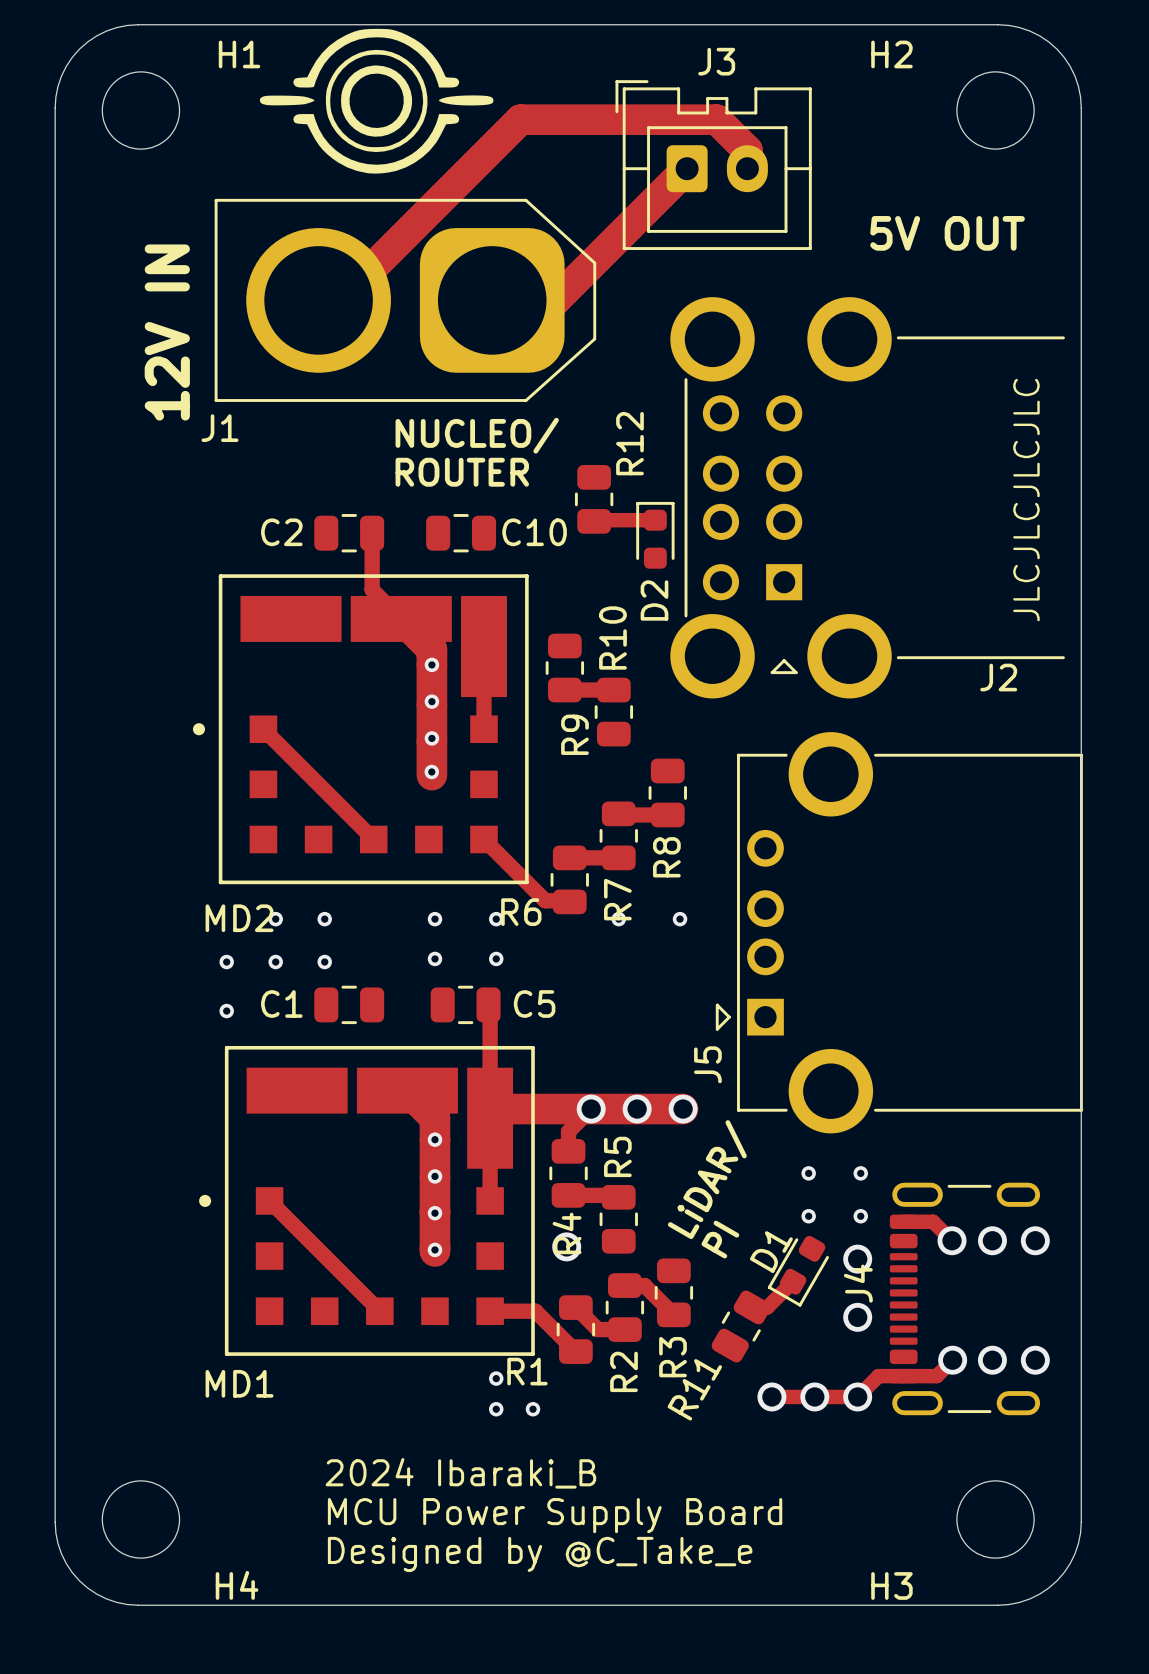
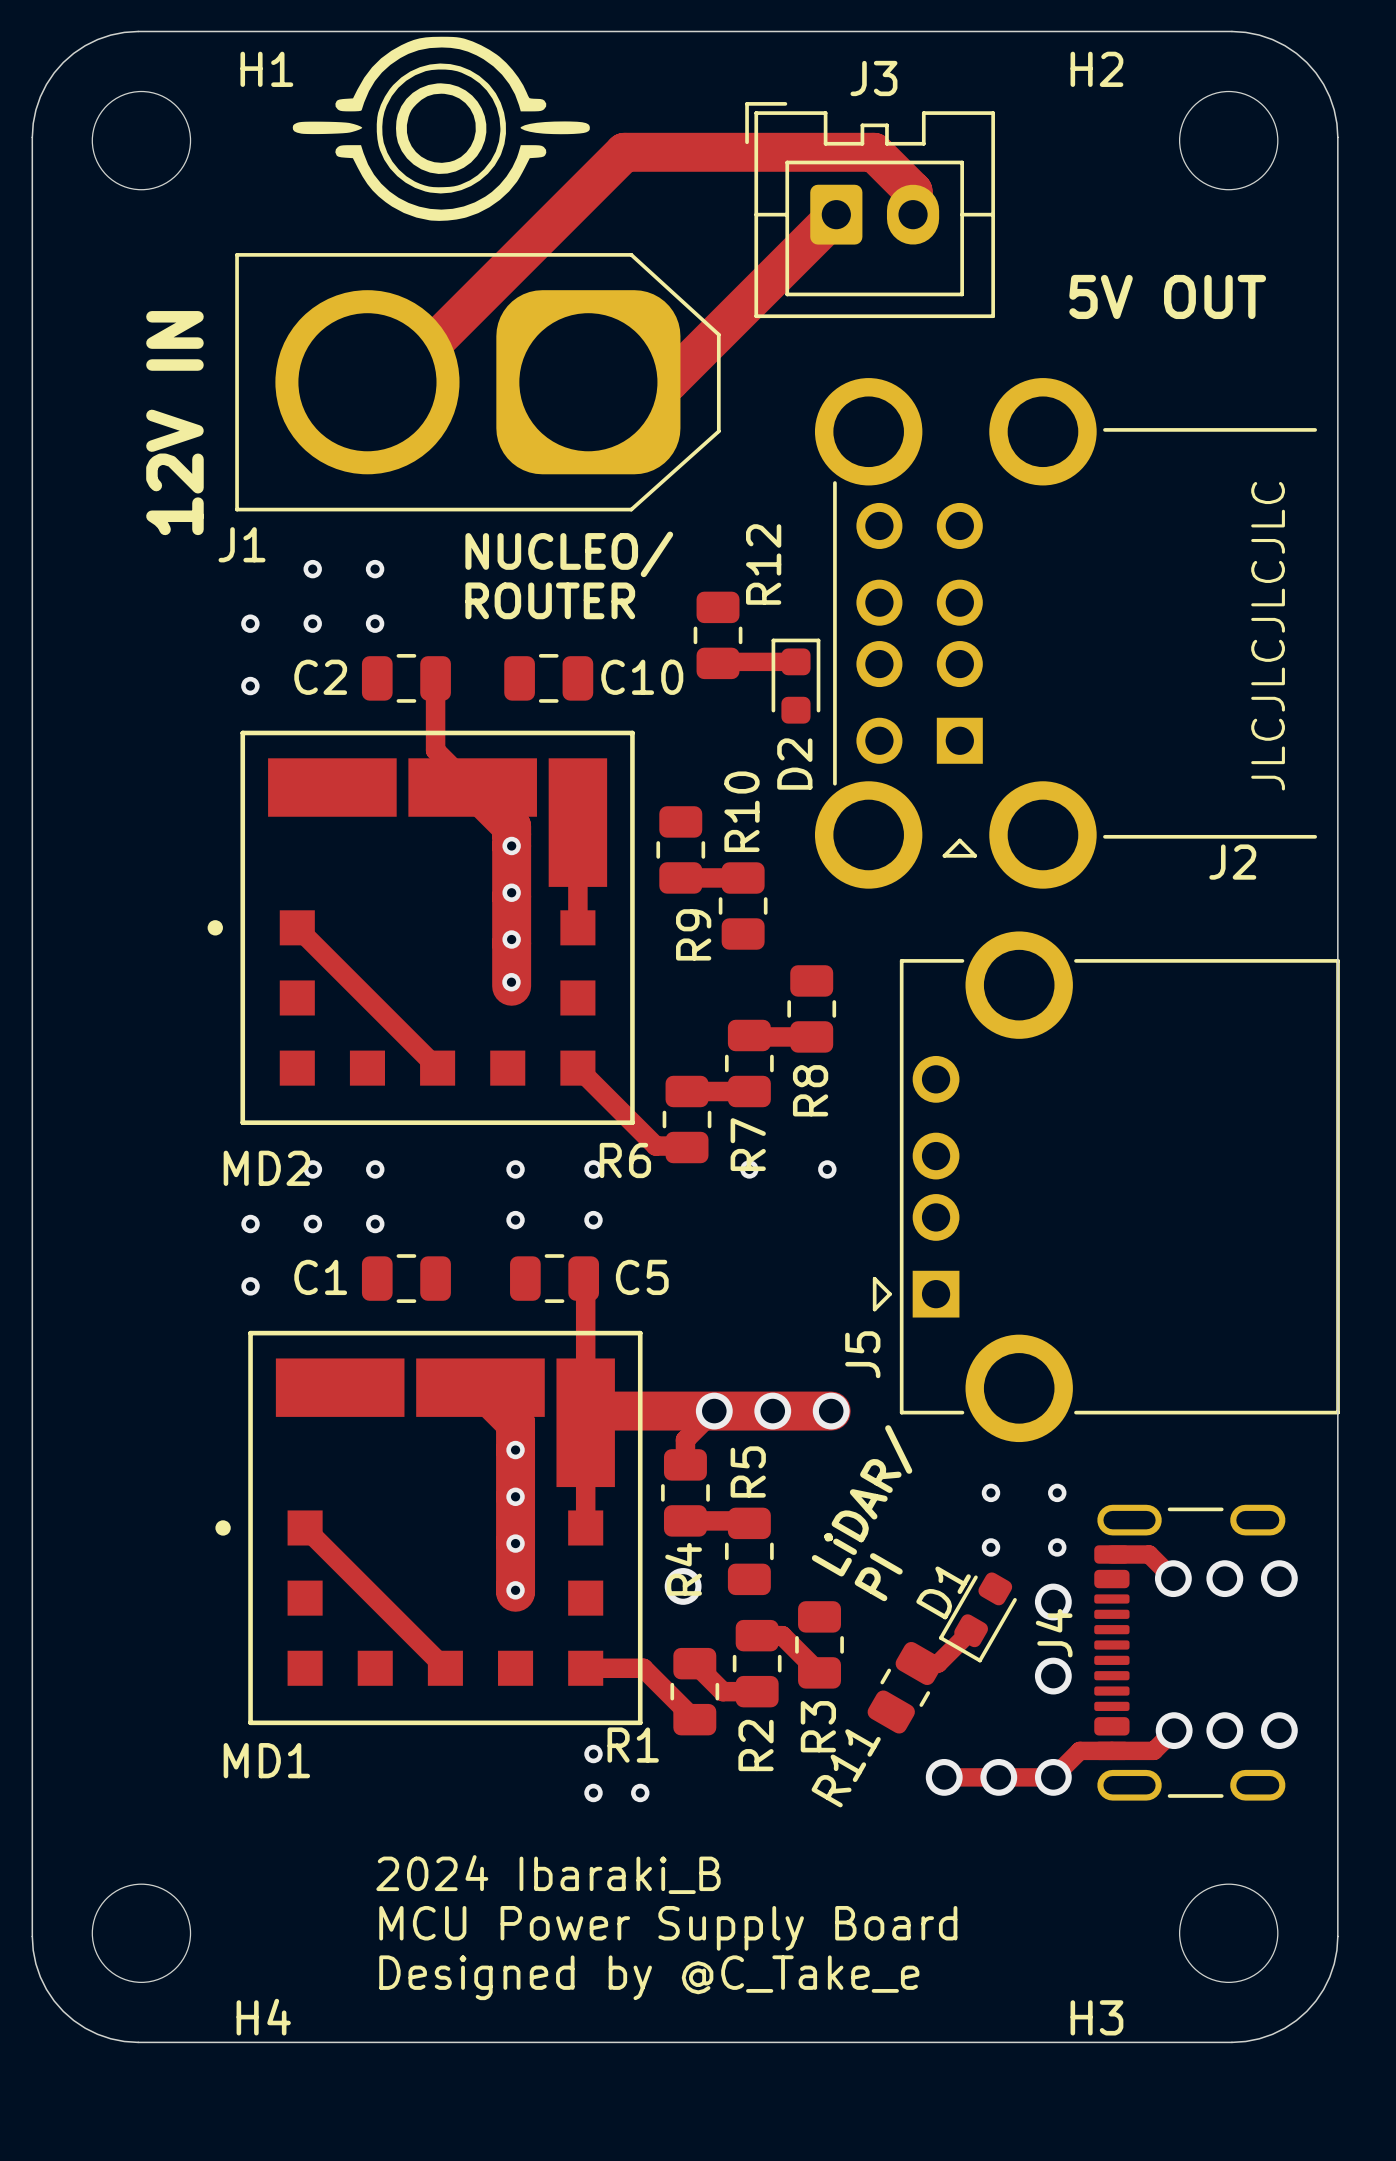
via: none -> (312, 569)
via: none -> (375, 569)
via: none -> (250, 623)
via: none -> (312, 623)
via: none -> (375, 623)
via: none -> (250, 686)

